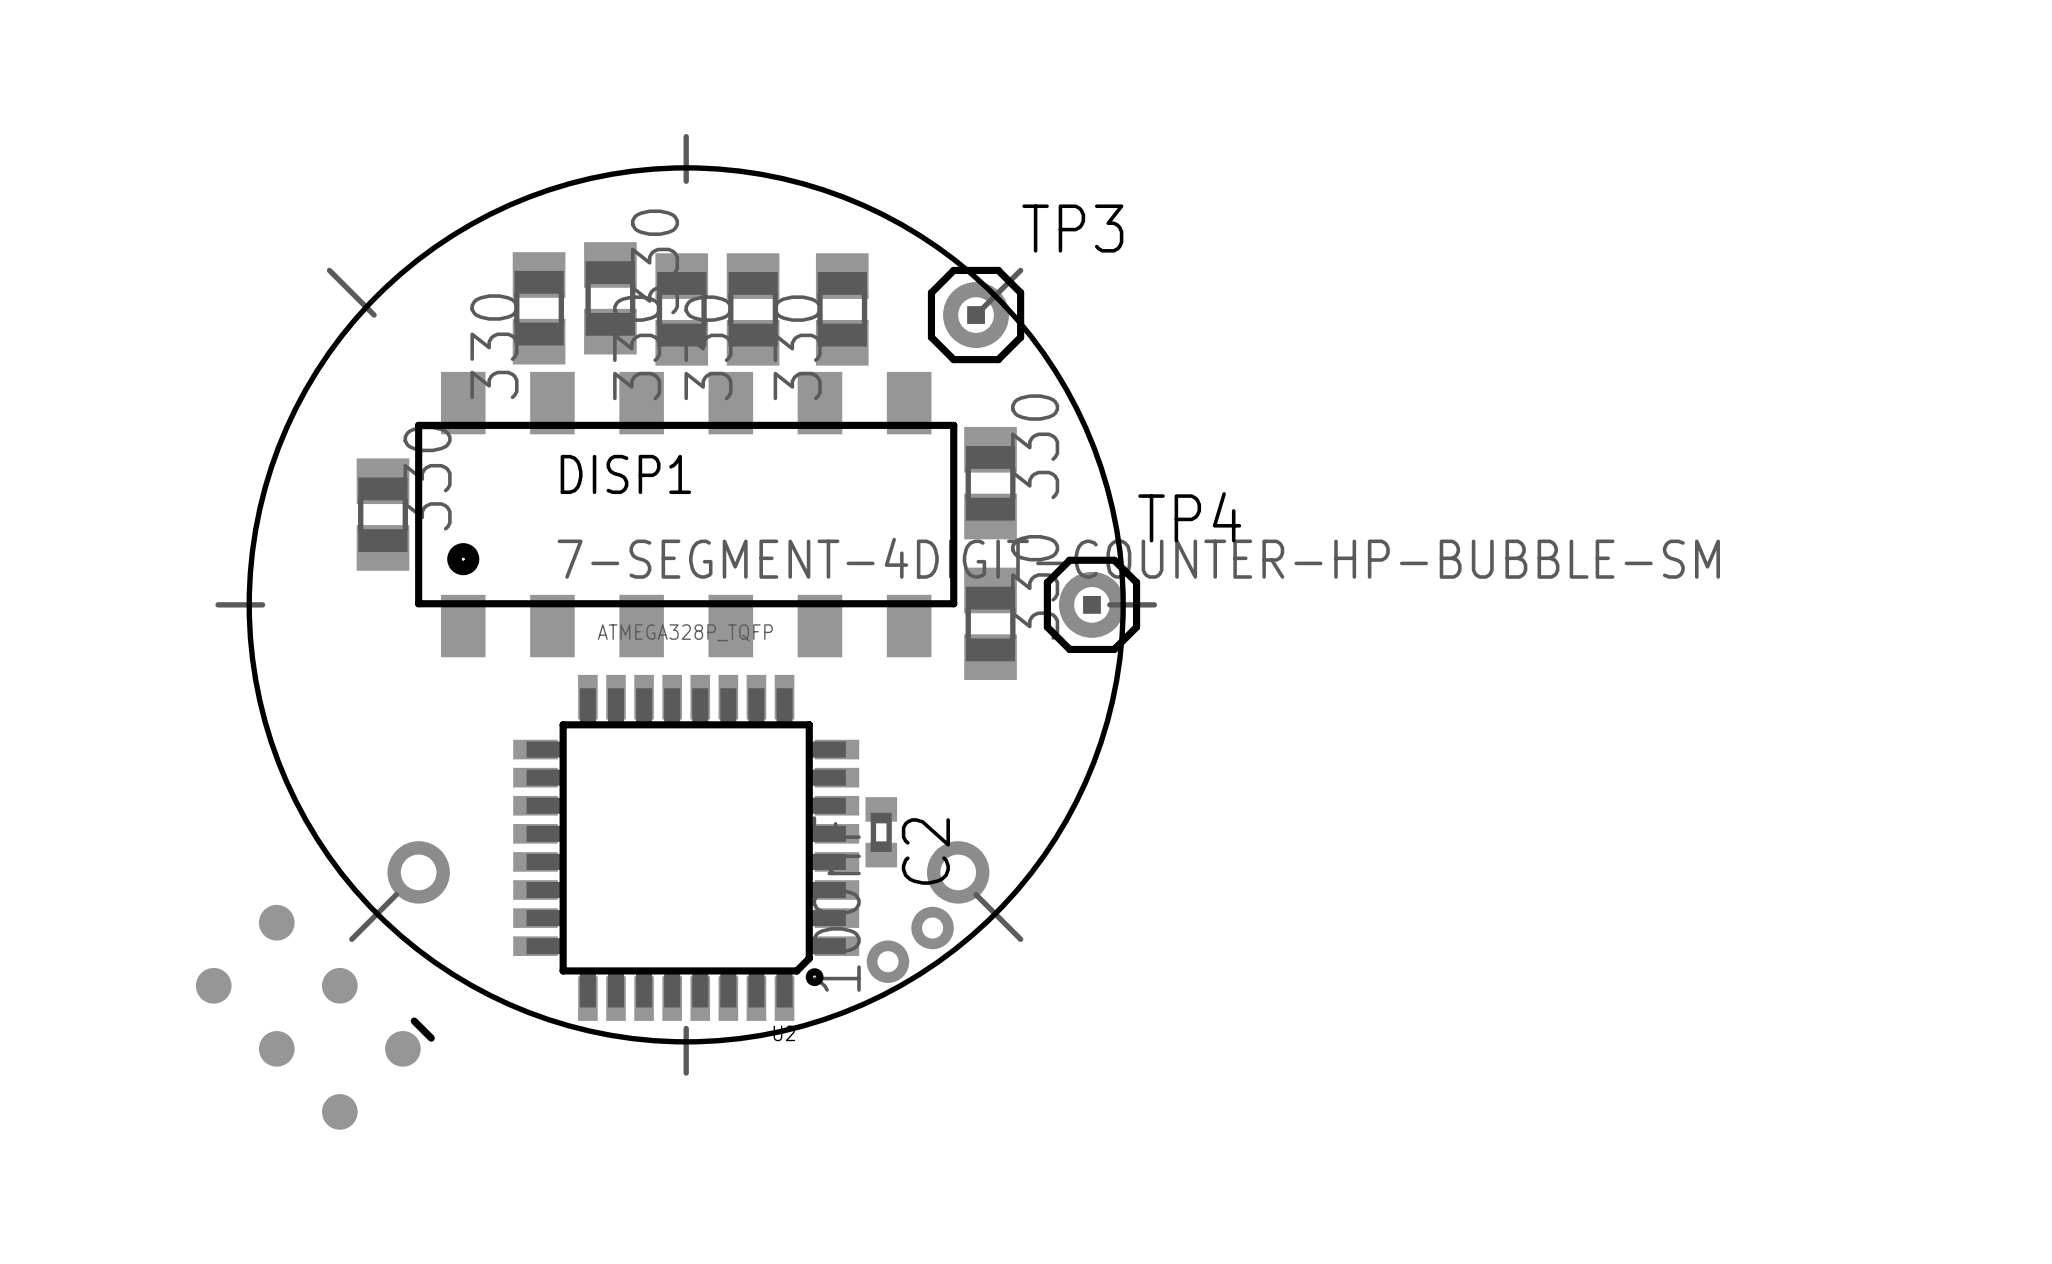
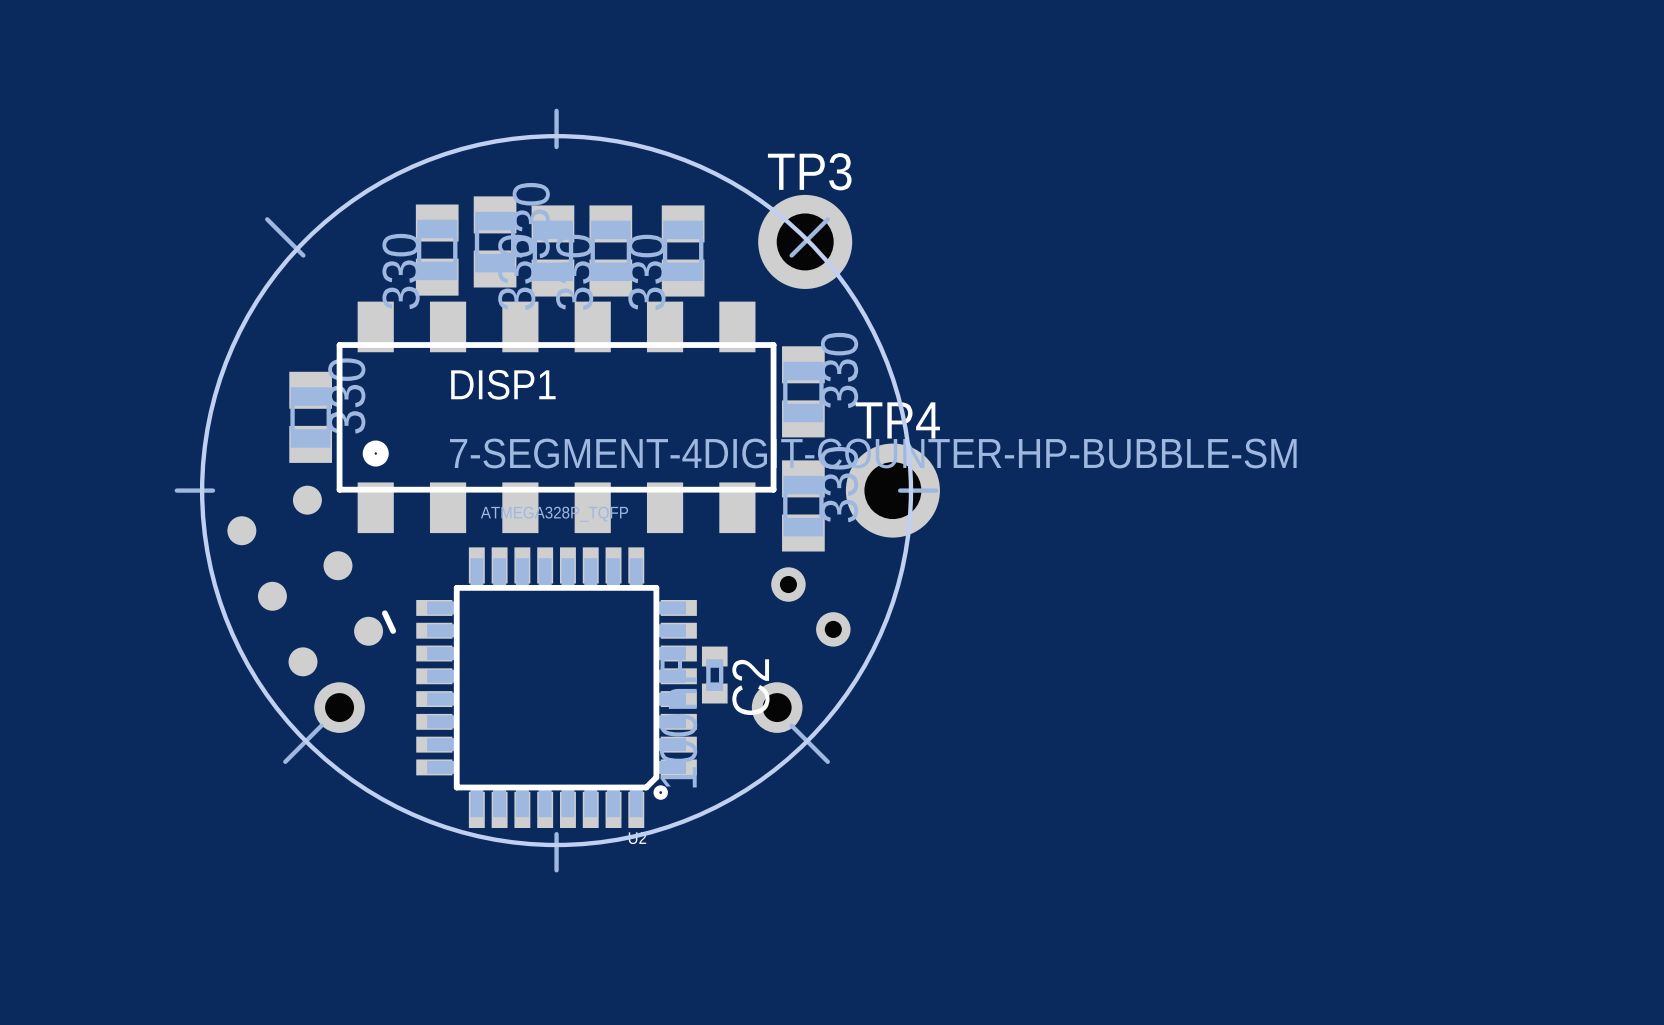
TP3 name position: TP3 (1072, 228) -> TP3 (809, 171)
TP3 footprint: [927, 266, 1025, 364] -> [758, 194, 853, 289]
TP4 name position: TP4 (1189, 517) -> TP4 (897, 420)
TP4 footprint: [1043, 556, 1141, 654] -> [845, 443, 940, 538]
part: none -> (311, 580)
part: none -> (810, 606)
part: (910, 944) -> none
part: (315, 1017) -> none

